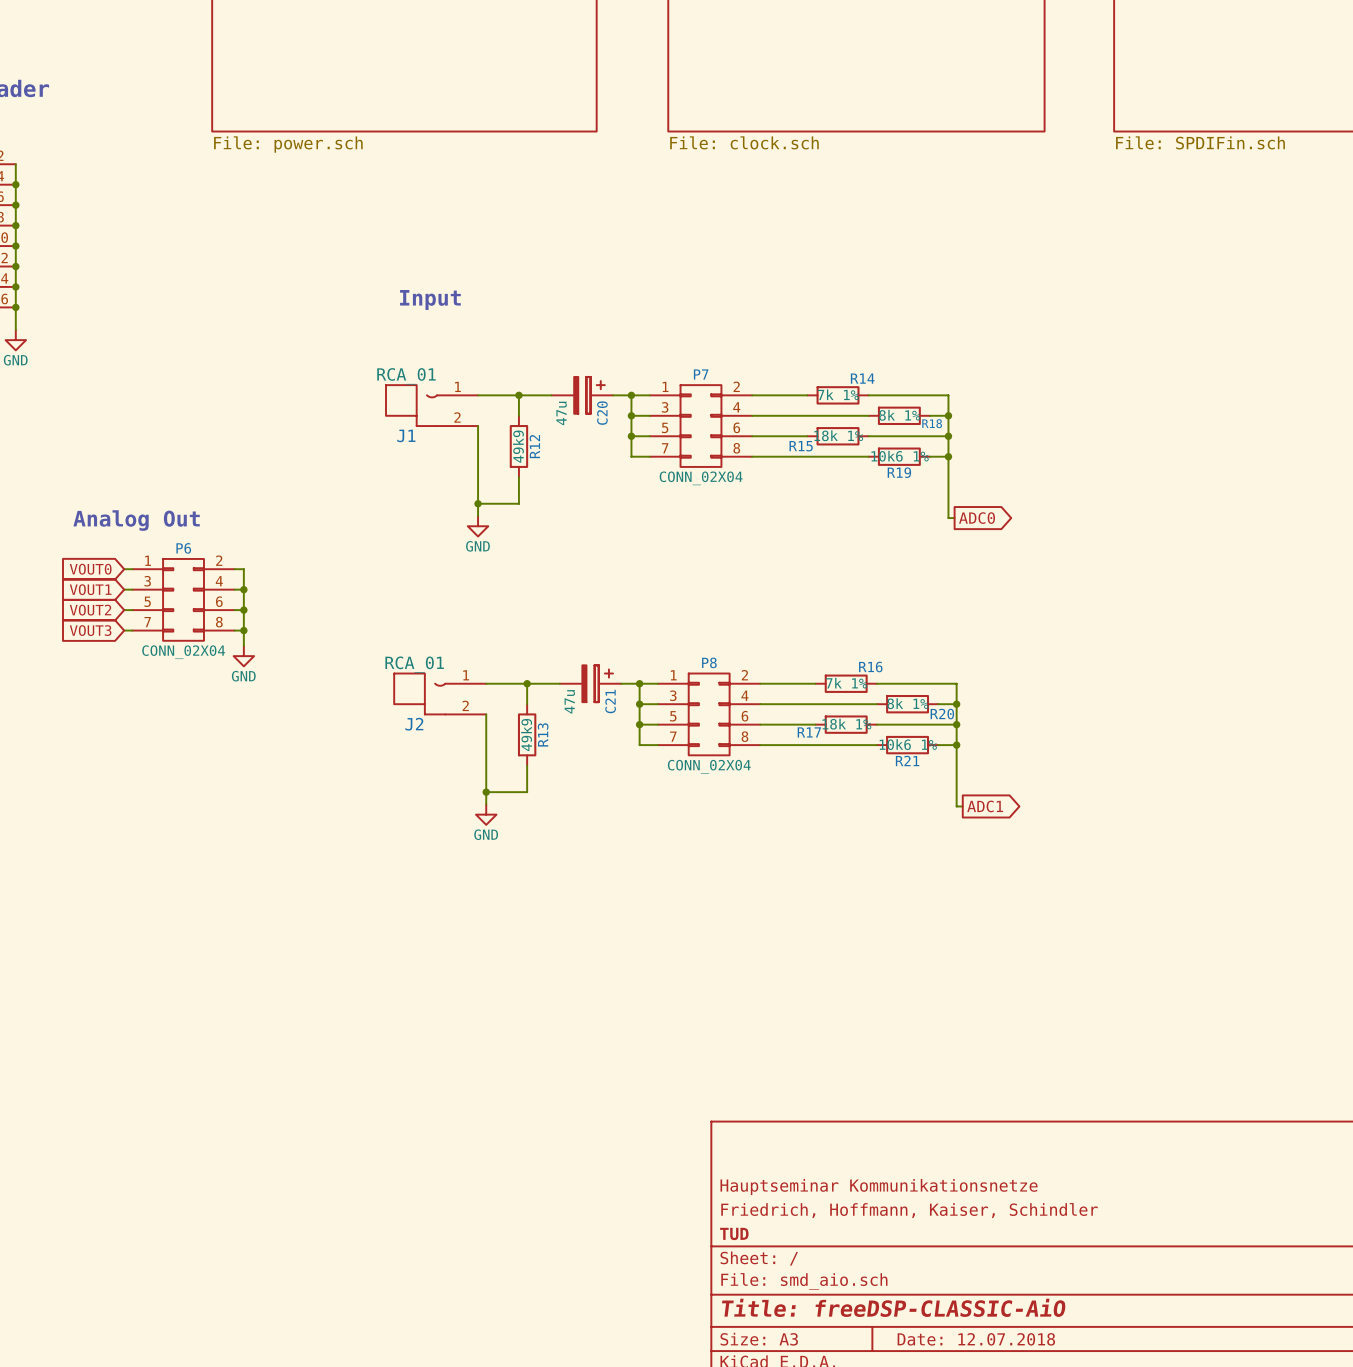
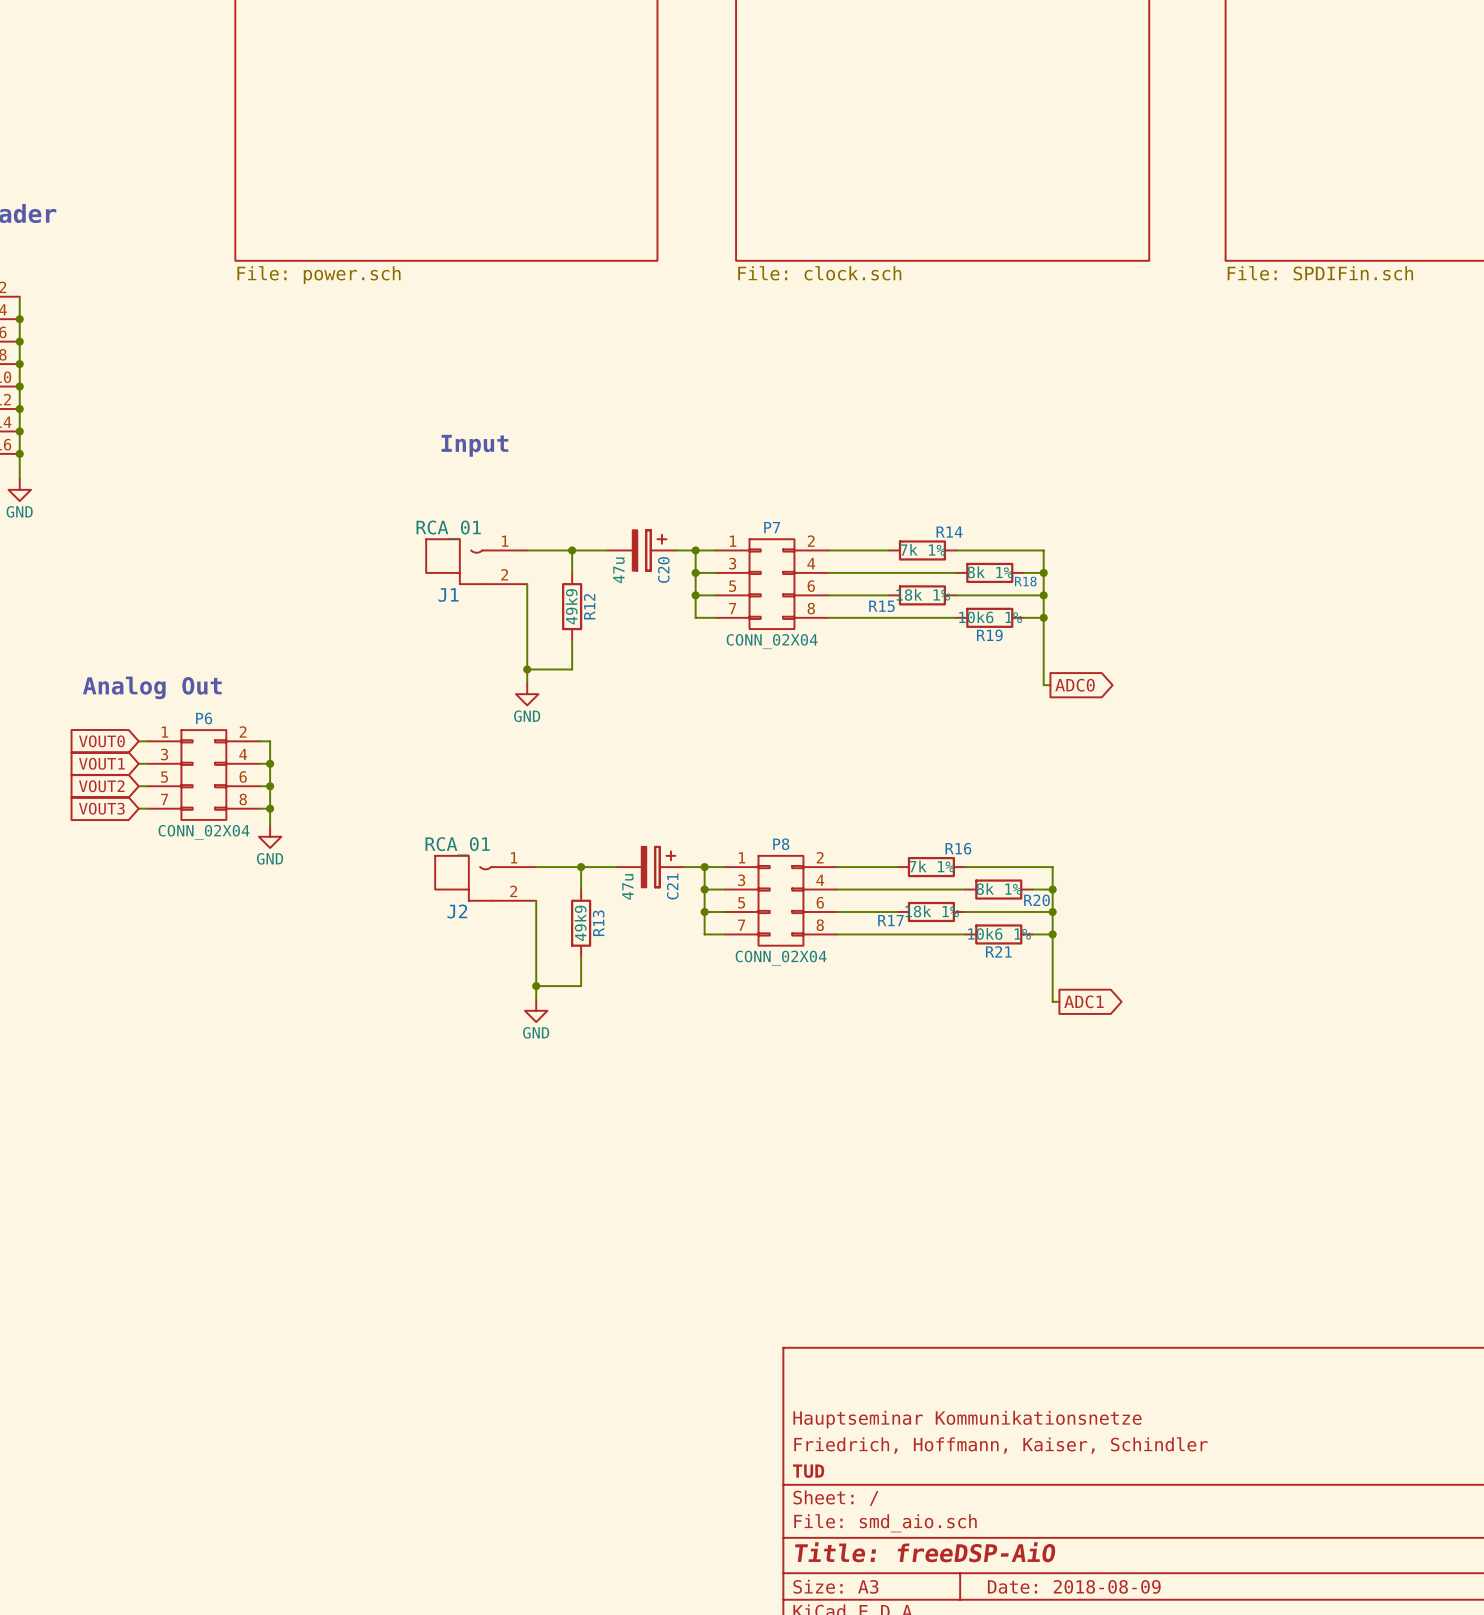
title block: Title: freeDSP-CLASSIC-AiO (893, 1307) -> Title: freeDSP-AiO (925, 1552)
title block: Date: 12.07.2018 (976, 1339) -> Date: 2018-08-09 (1074, 1586)

